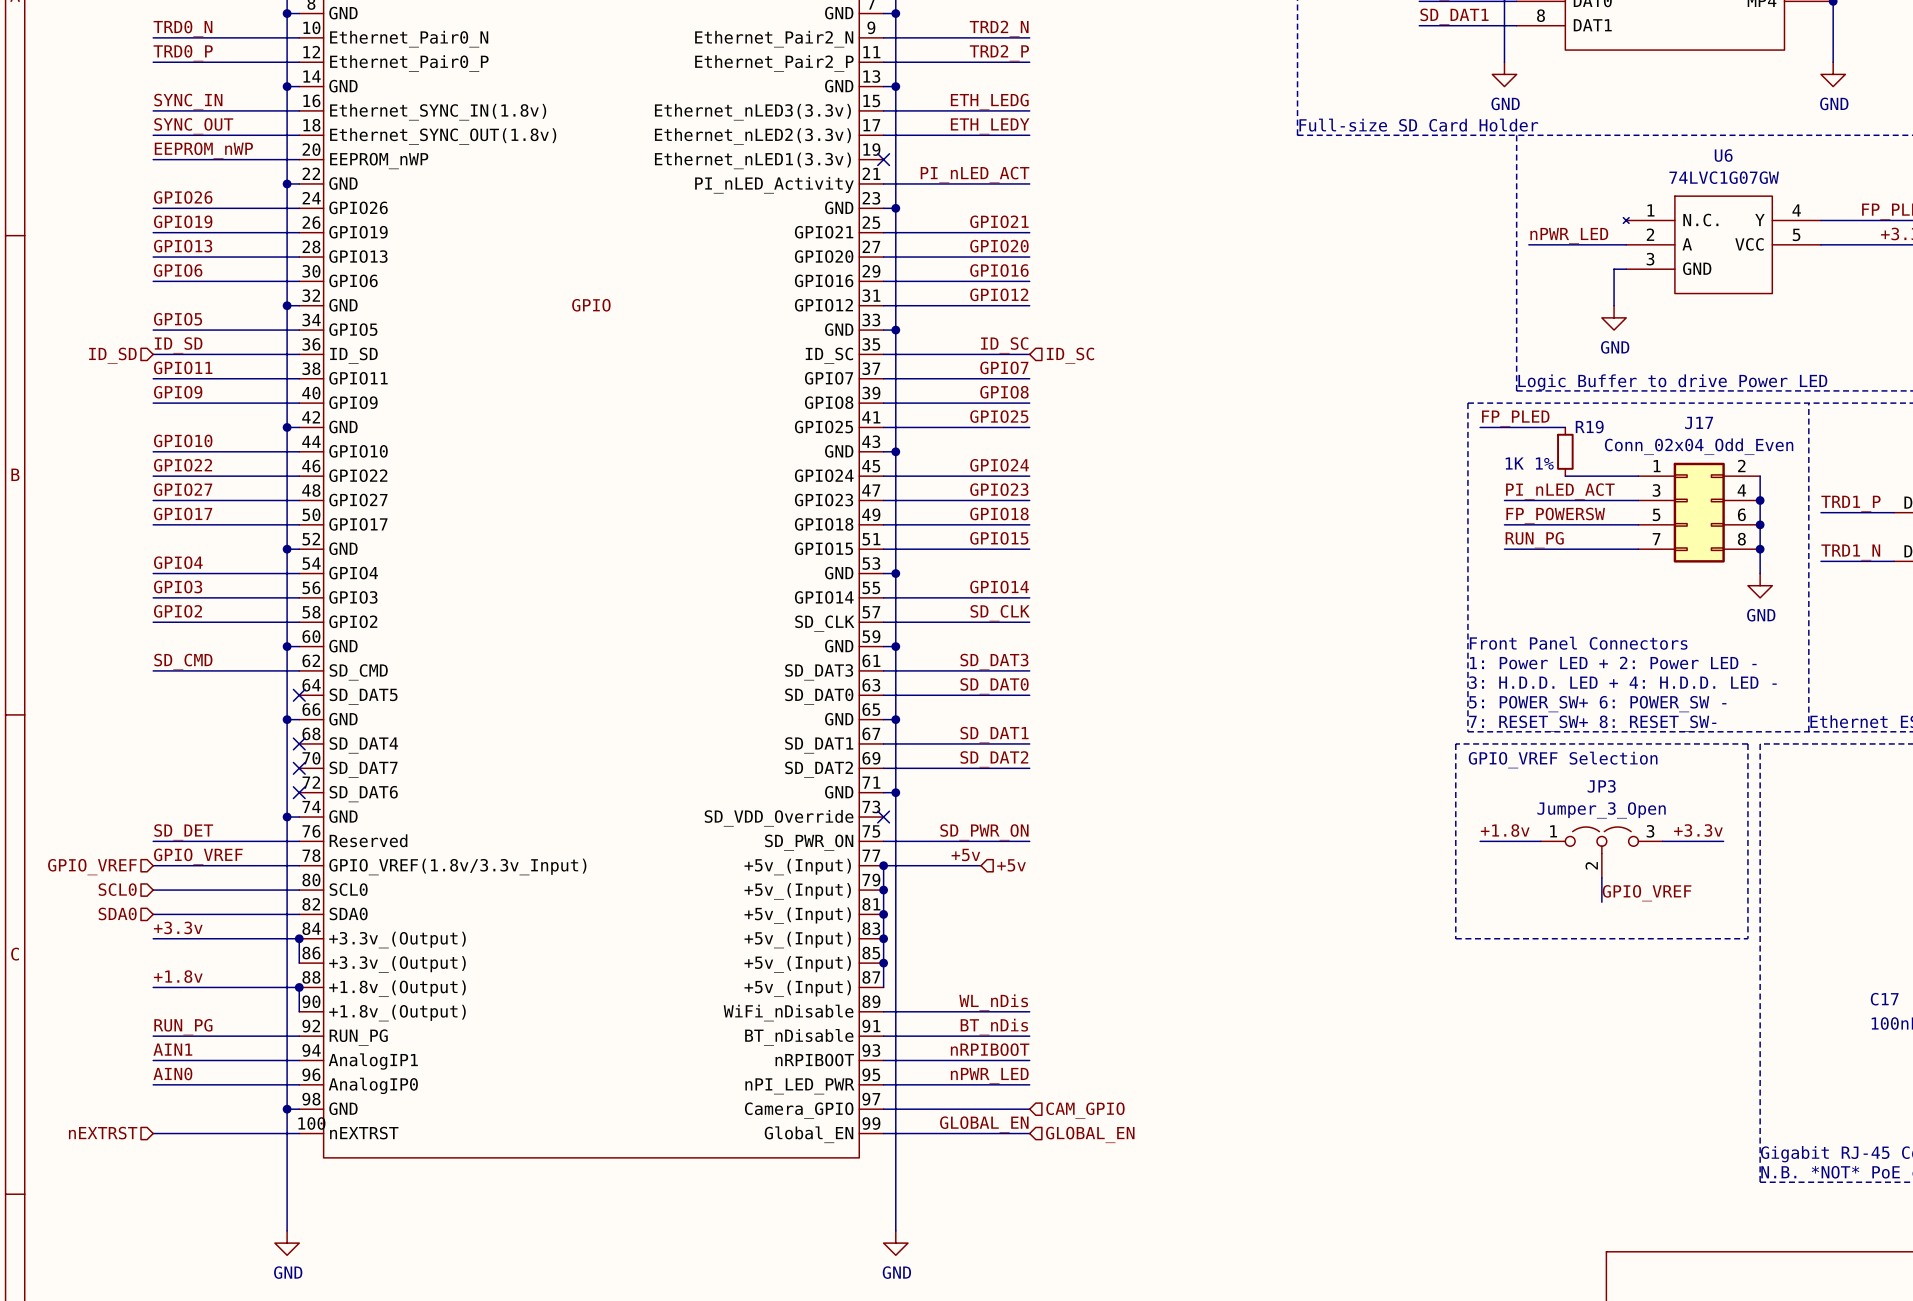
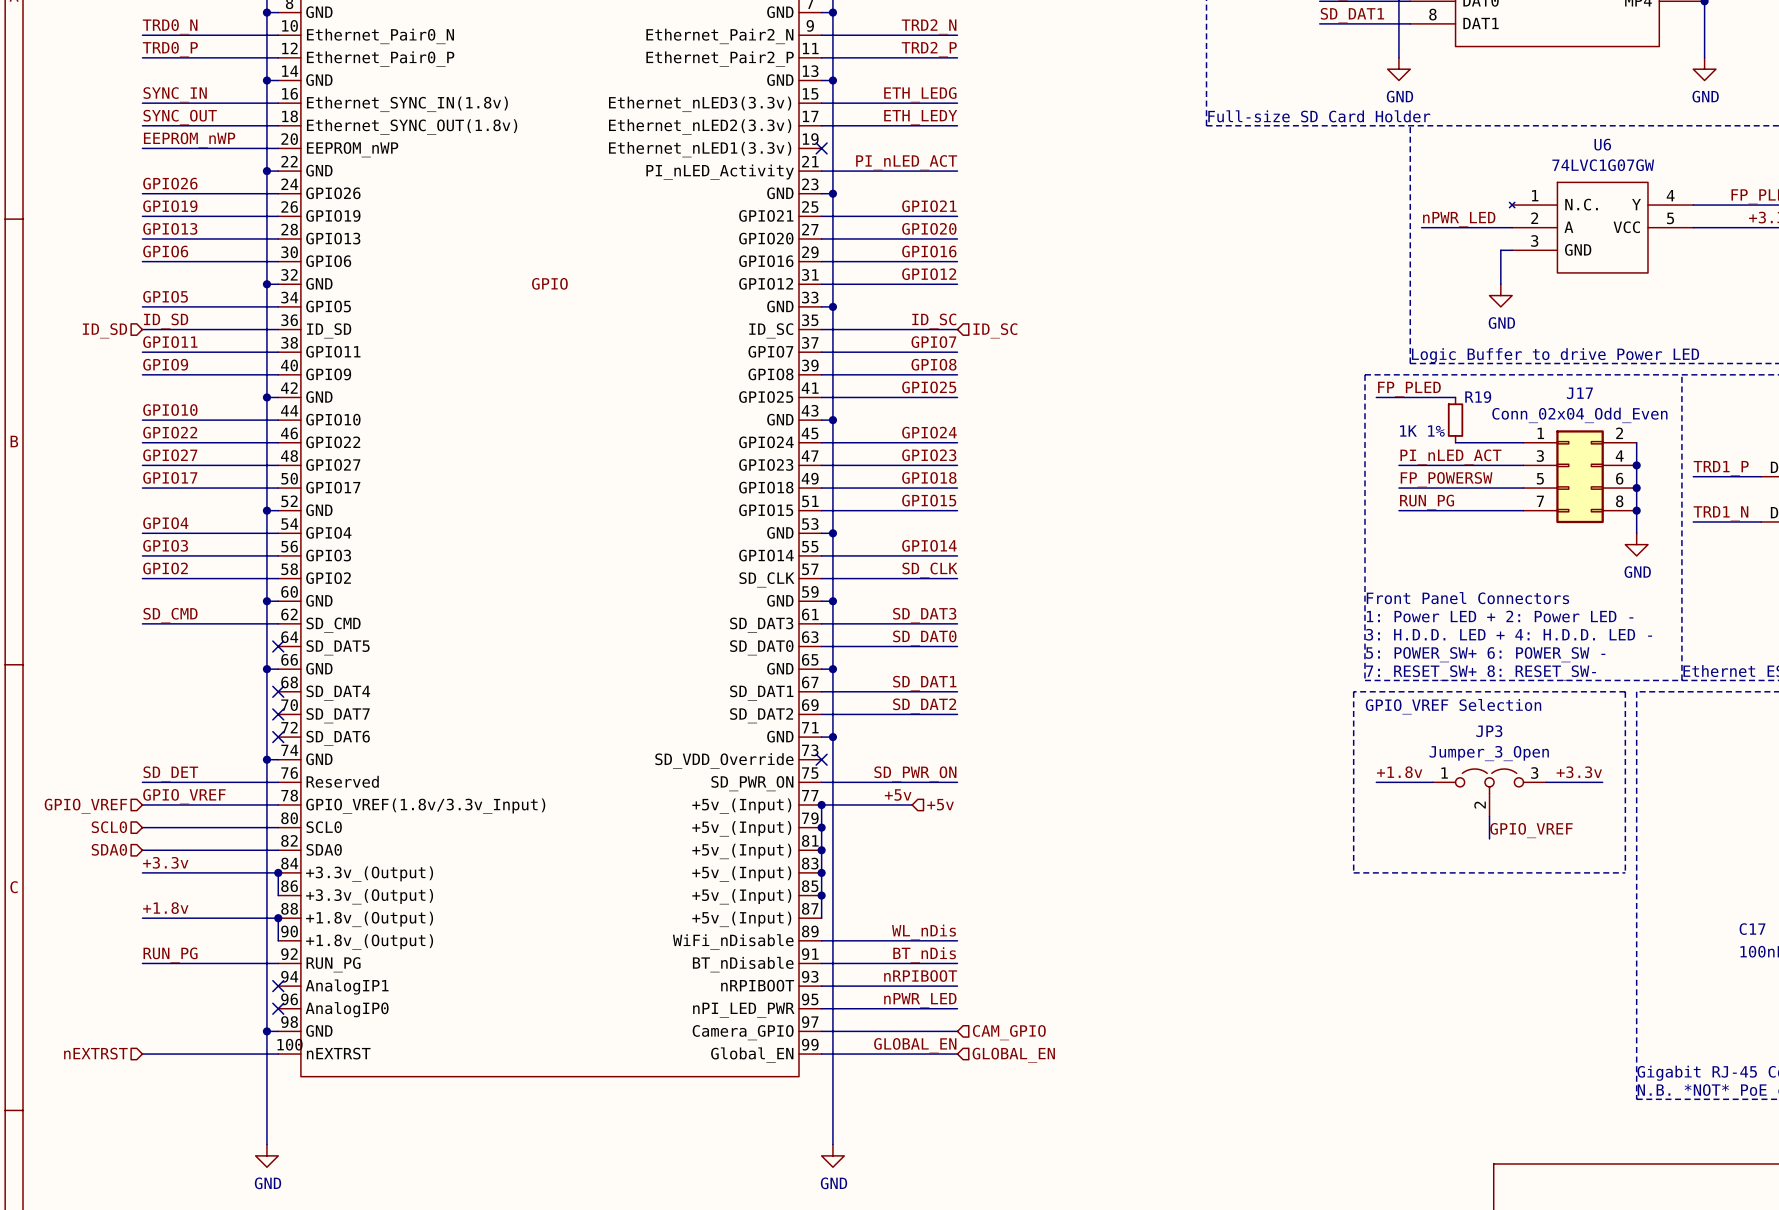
label: AIN1 (172, 1049) -> none
wire: (153, 1060) (299, 1060) -> none
no-connect mark: none -> (278, 986)
label: AIN0 (172, 1073) -> none
wire: (153, 1084) (299, 1084) -> none
no-connect mark: none -> (278, 1008)

